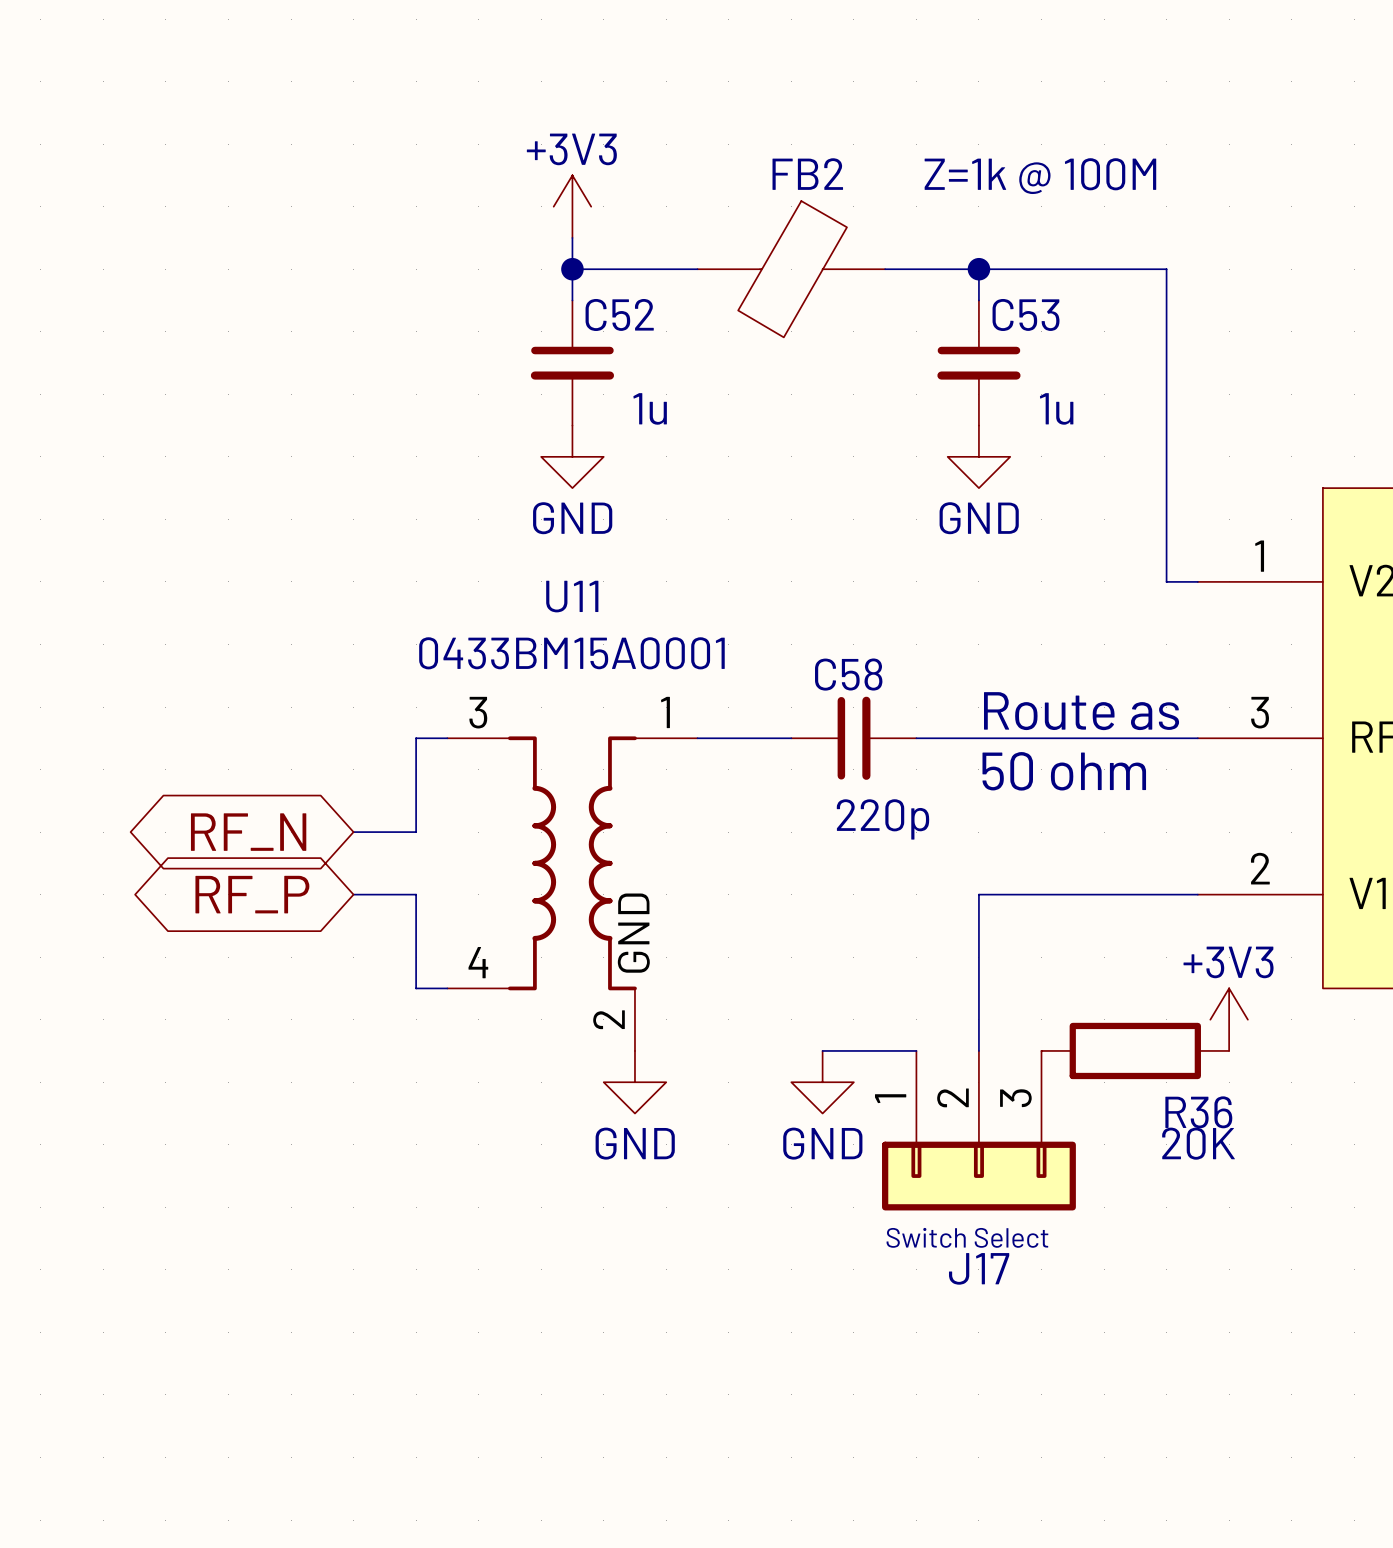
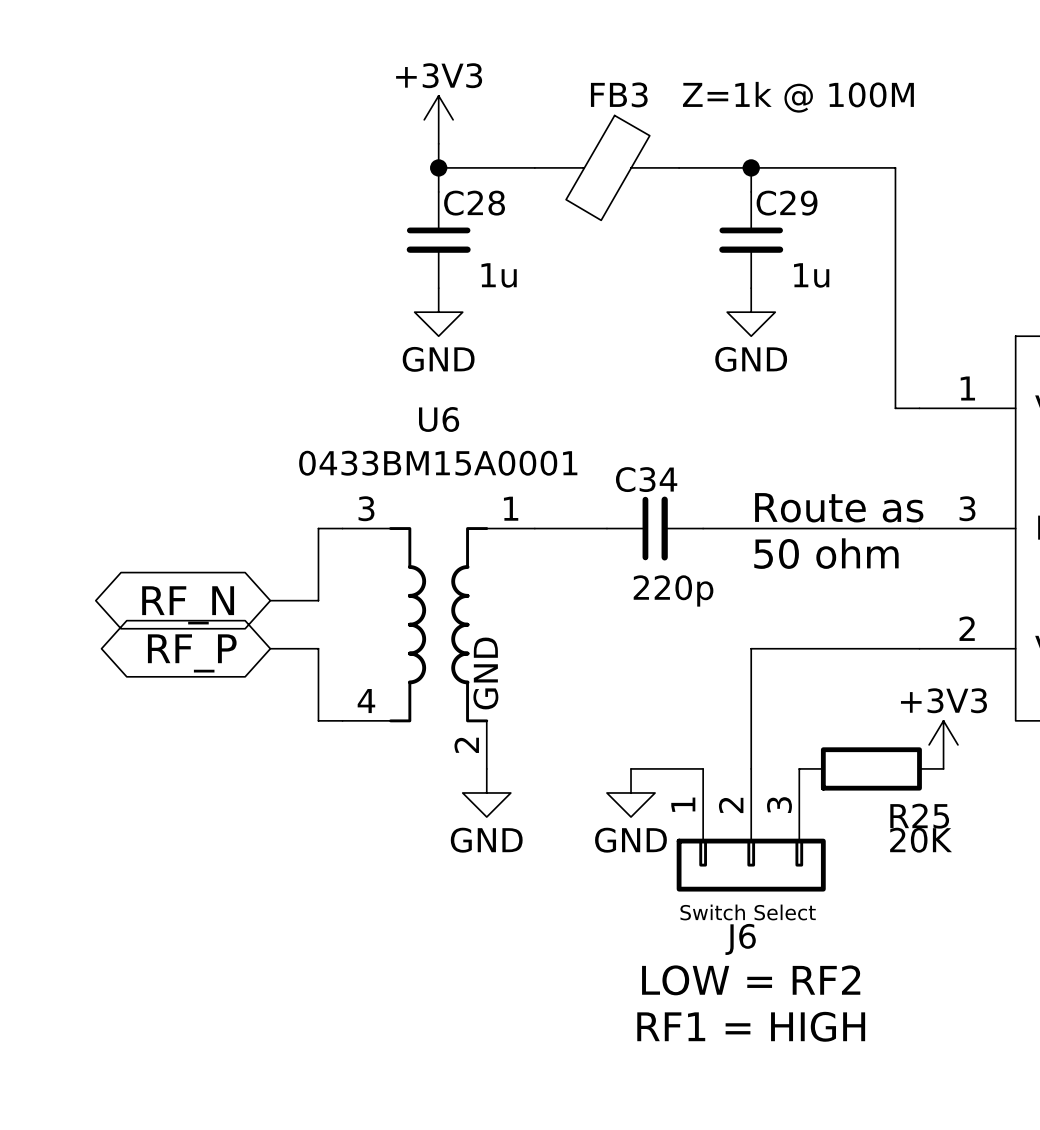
FB2 name: FB2 (807, 174) -> FB3 (619, 94)
C52 name: C52 (619, 314) -> C28 (474, 203)
C53 name: C53 (1026, 314) -> C29 (787, 203)
U11 name: U11 (572, 596) -> U6 (439, 419)
C58 name: C58 (848, 674) -> C34 (646, 479)
R36 name: R36 (1198, 1112) -> R25 (919, 816)
J17 name: J17 (979, 1268) -> J6 (740, 939)
text: none -> LOW = RF2 (751, 980)
text: none -> RF1 = HIGH (751, 1026)

